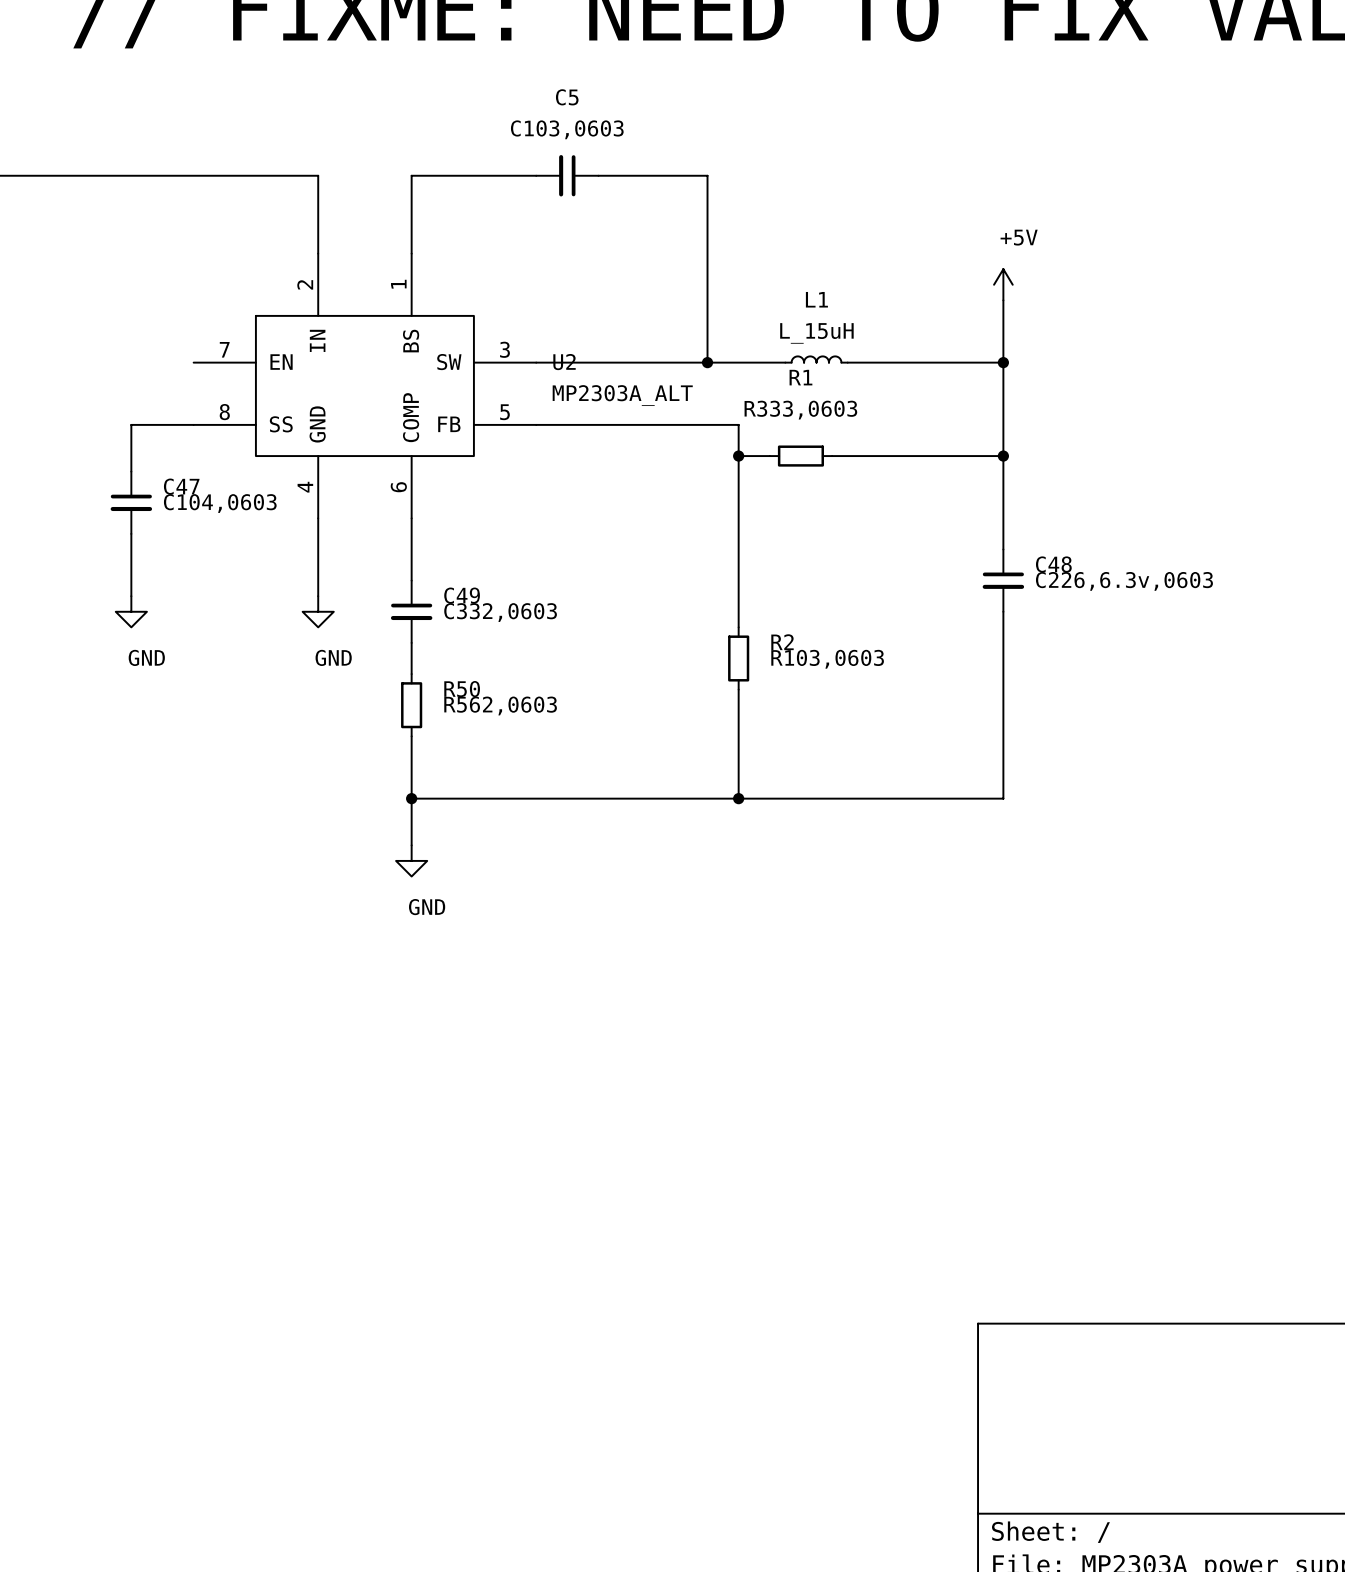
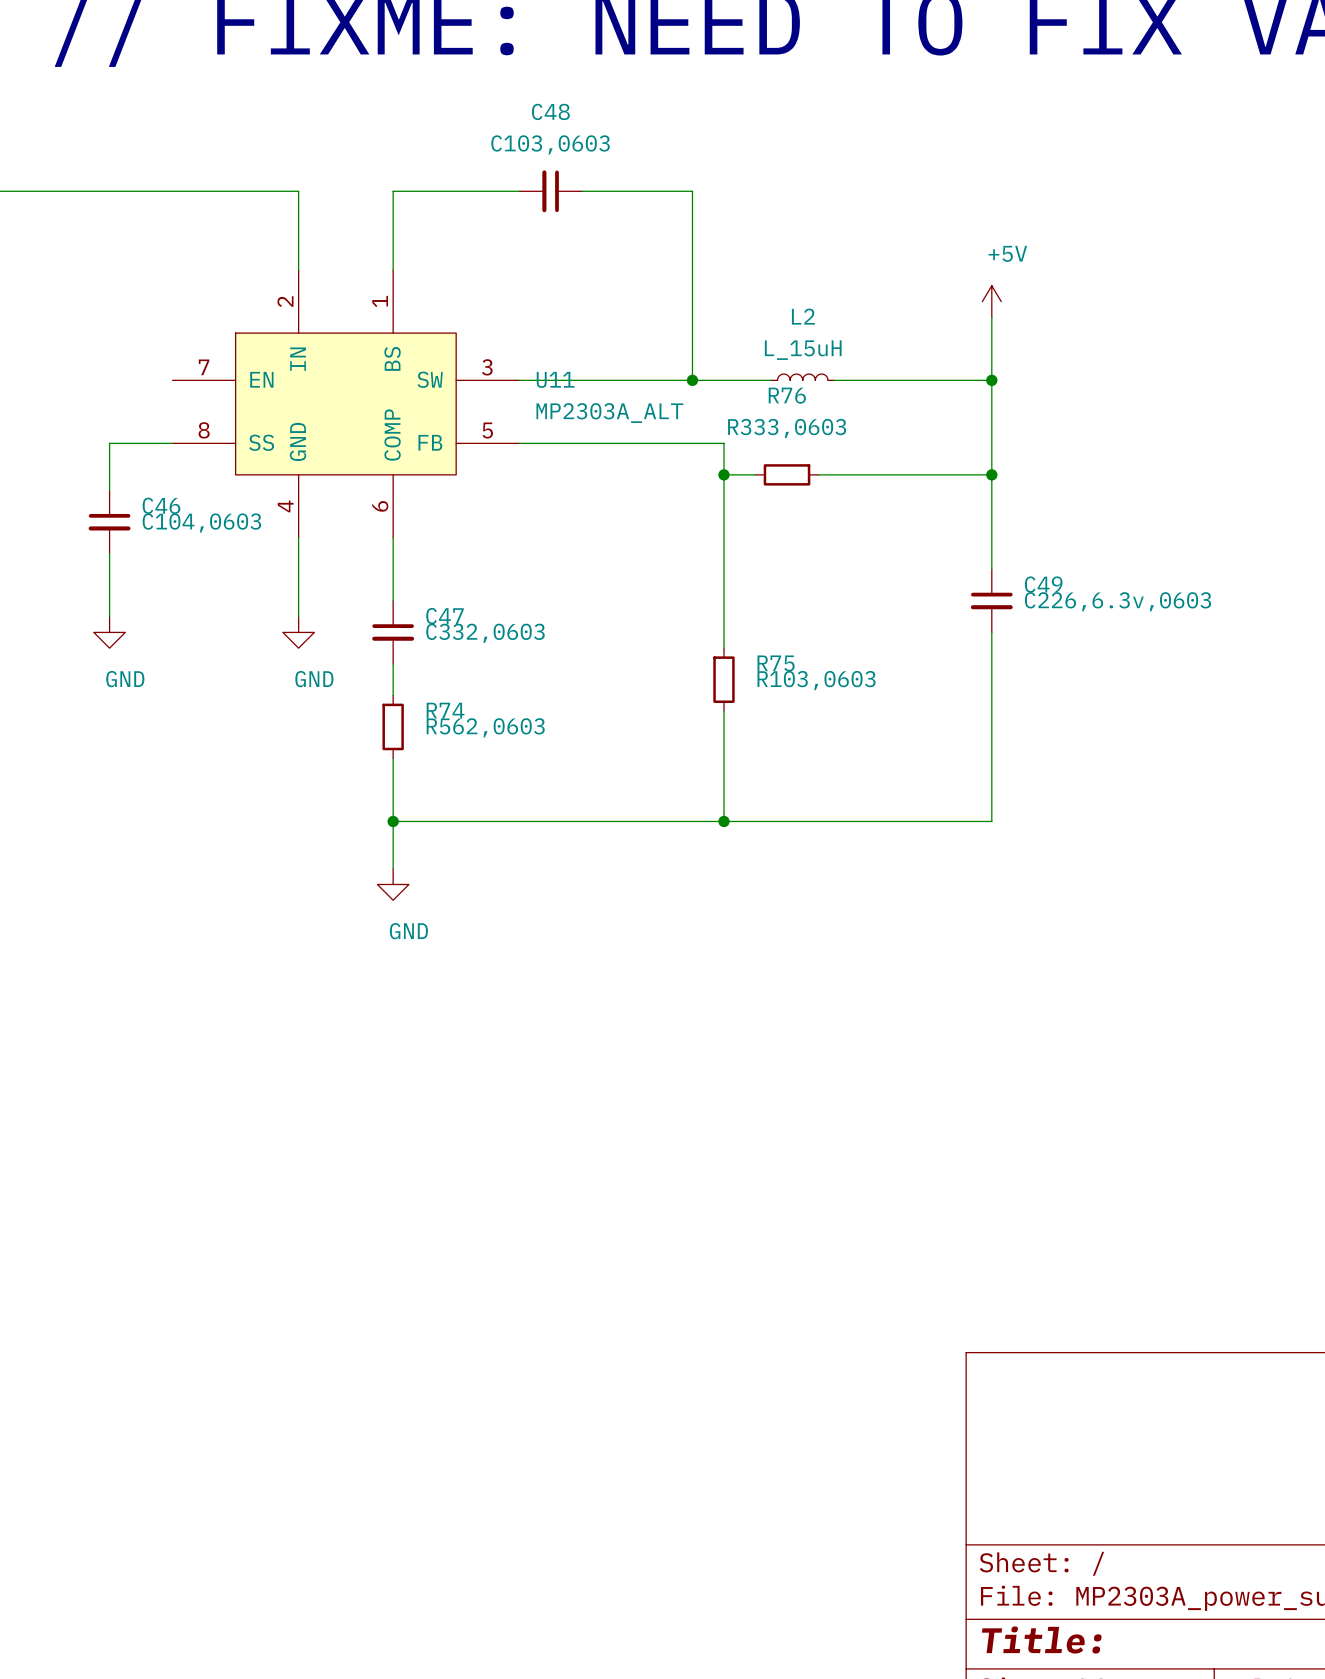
C5 name: C5 (567, 97) -> C48 (550, 111)
L1 name: L1 (816, 299) -> L2 (803, 316)
U2 name: U2 (564, 362) -> U11 (555, 379)
R1 name: R1 (800, 377) -> R76 (787, 395)
C47 name: C47 (181, 486) -> C46 (161, 505)
C48 name: C48 (1053, 564) -> C49 (1043, 584)
C49 name: C49 (462, 595) -> C47 (444, 616)
R2 name: R2 (782, 642) -> R75 (776, 663)
R50 name: R50 (462, 689) -> R74 (445, 710)

